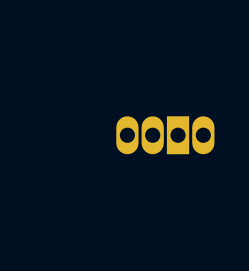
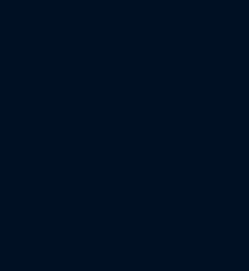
part: (165, 135) -> none

